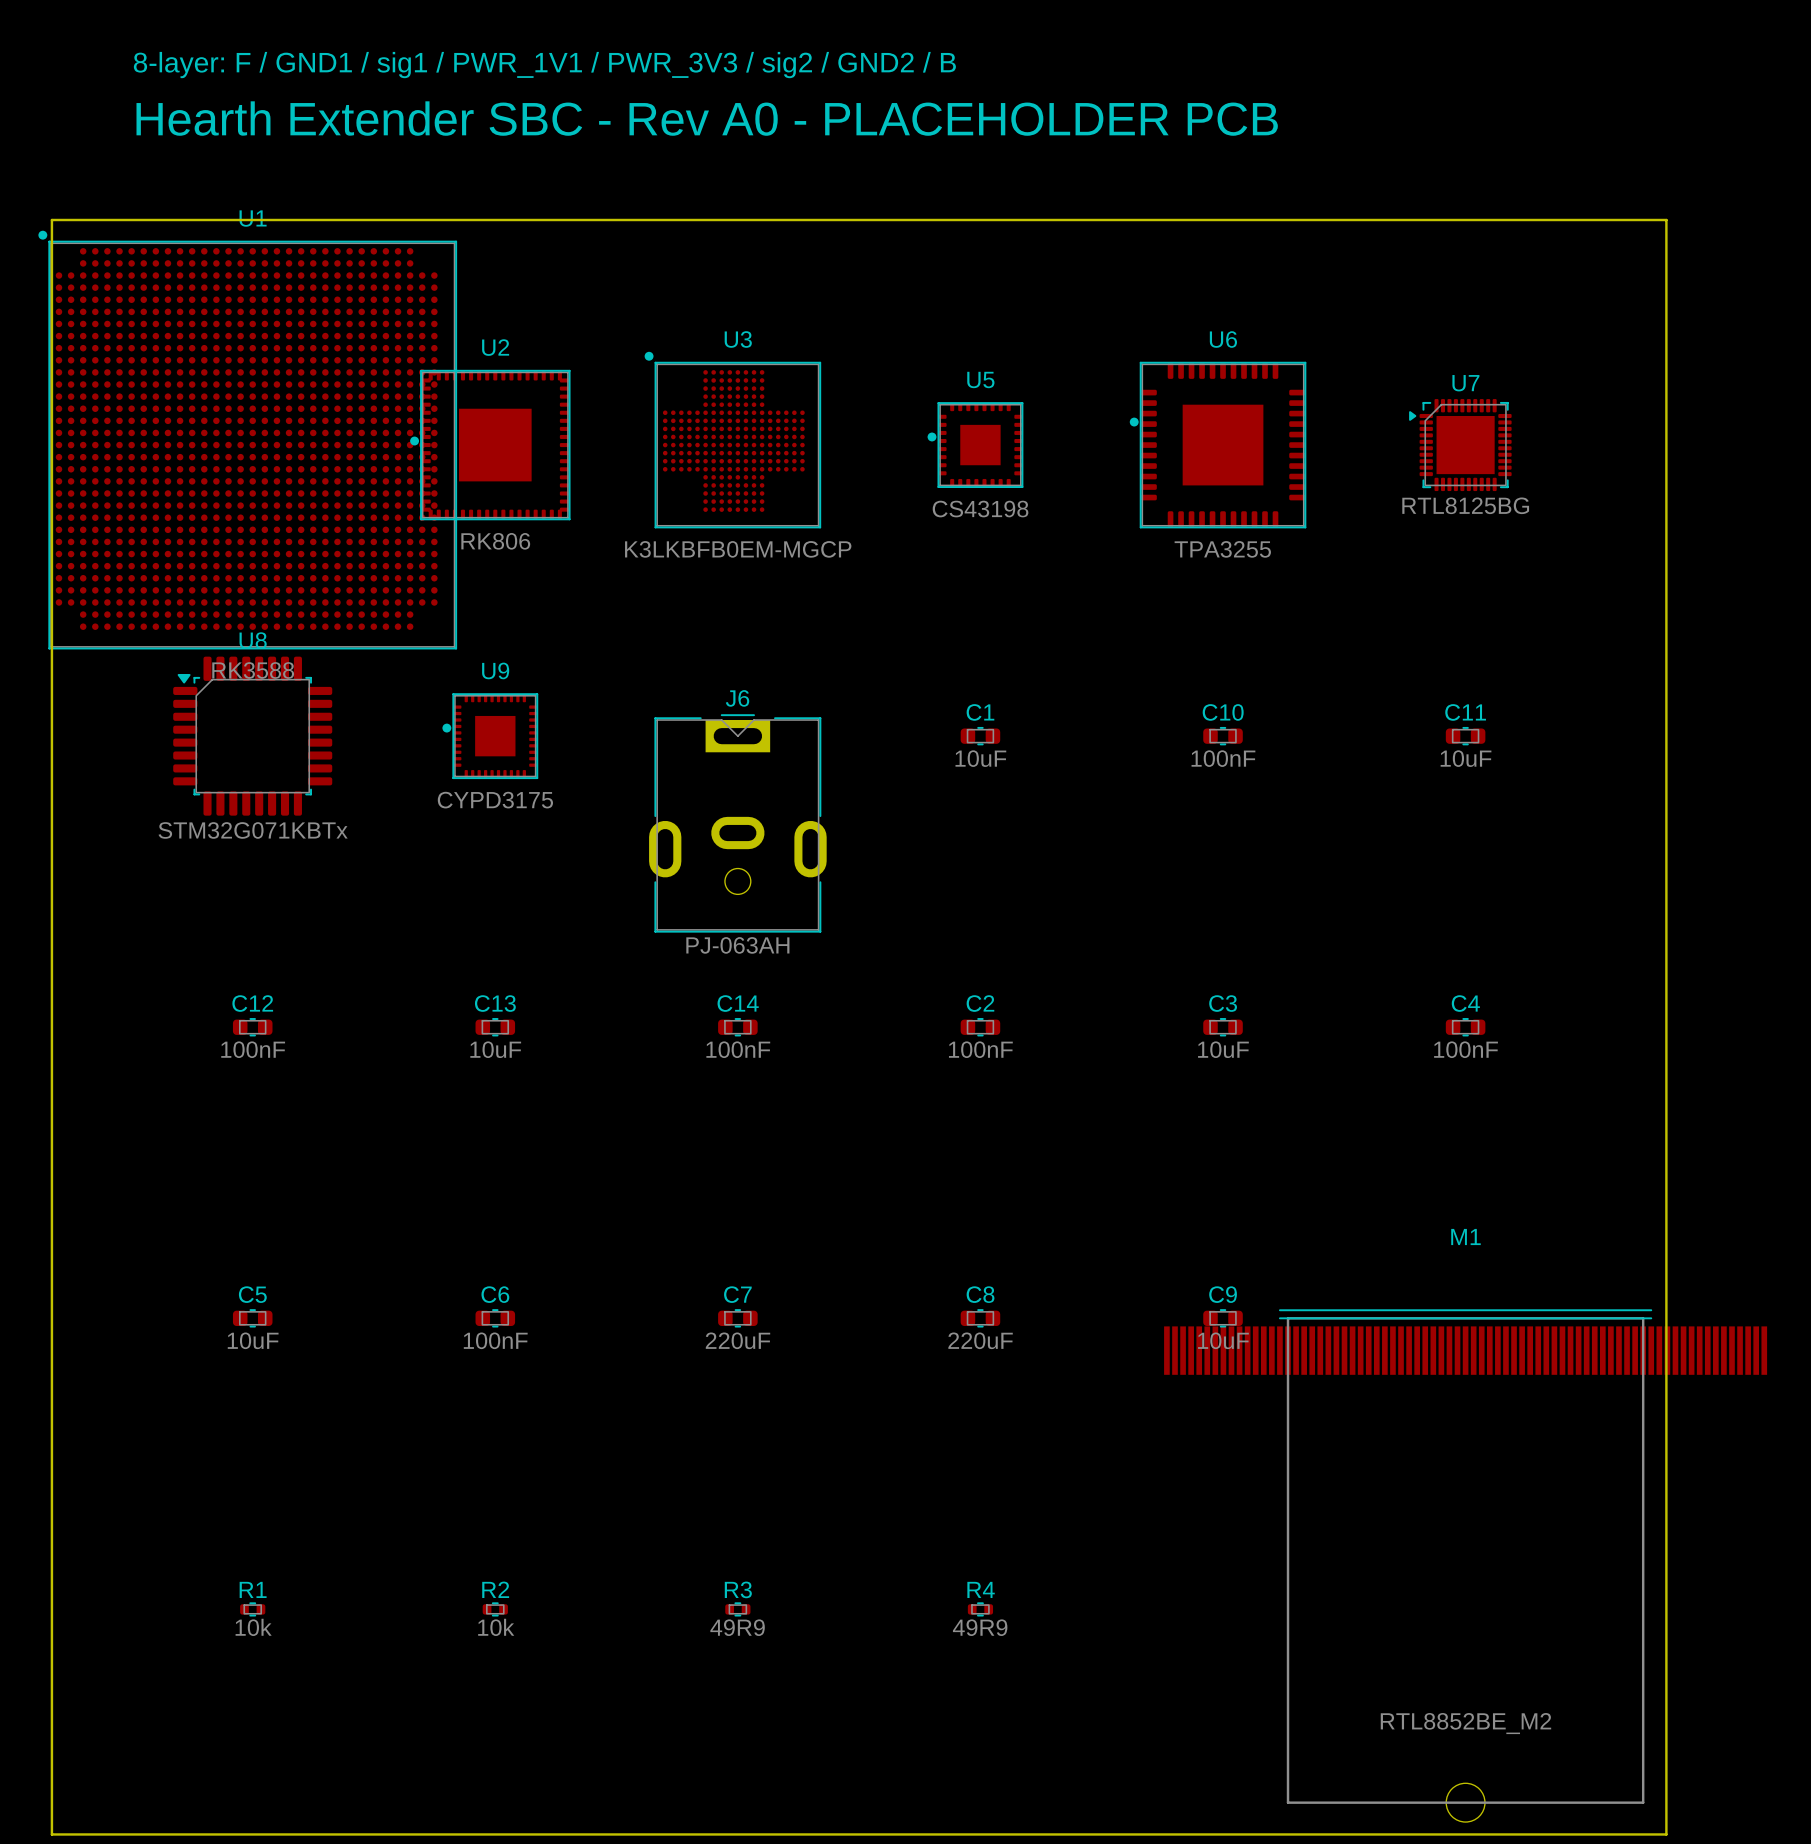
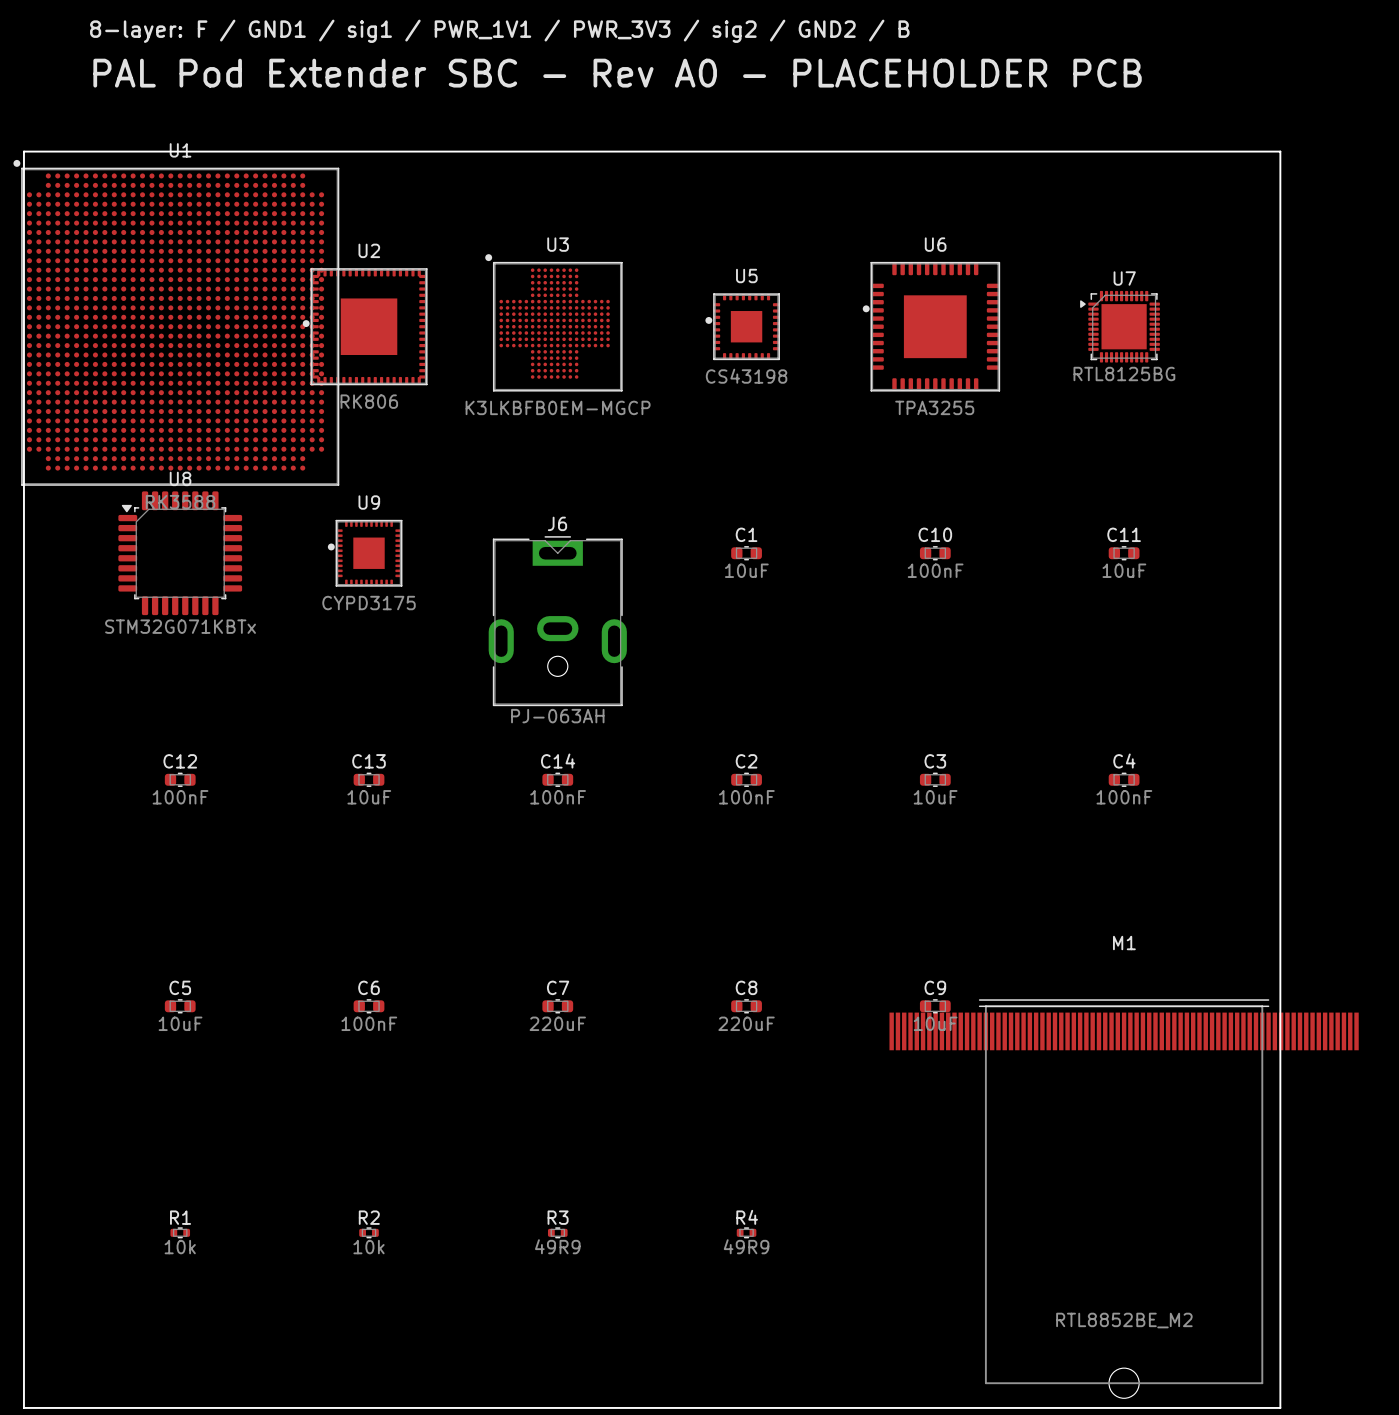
text: Hearth Extender SBC - Rev A0 - PLACEHOLDER PCB (707, 118) -> PAL Pod Extender SBC - Rev A0 - PLACEHOLDER PCB (617, 73)

